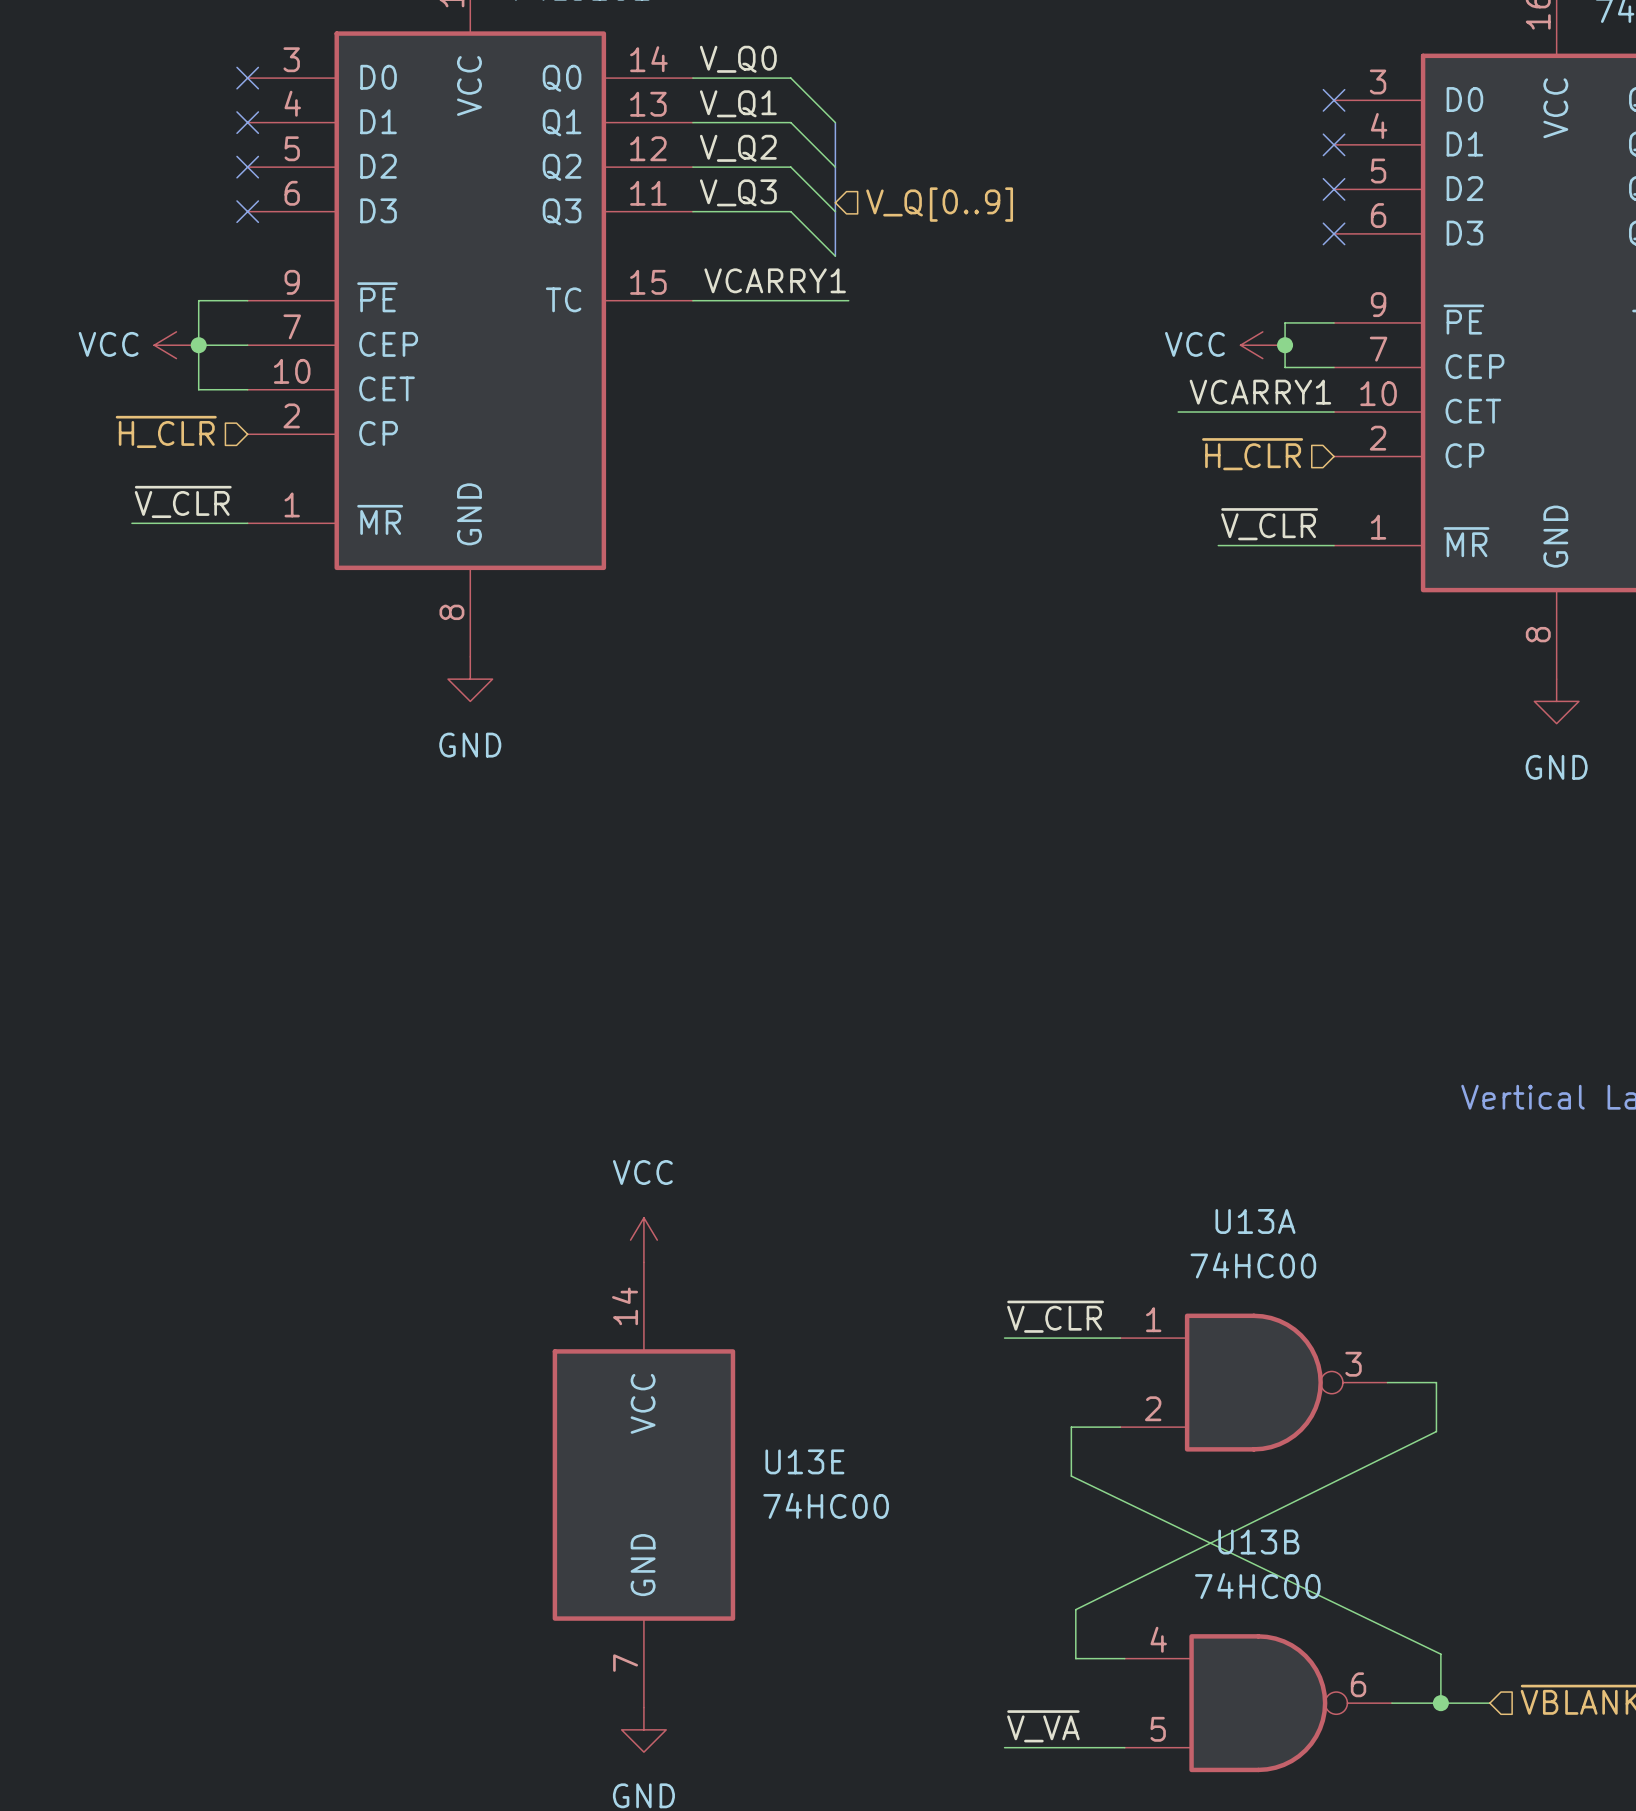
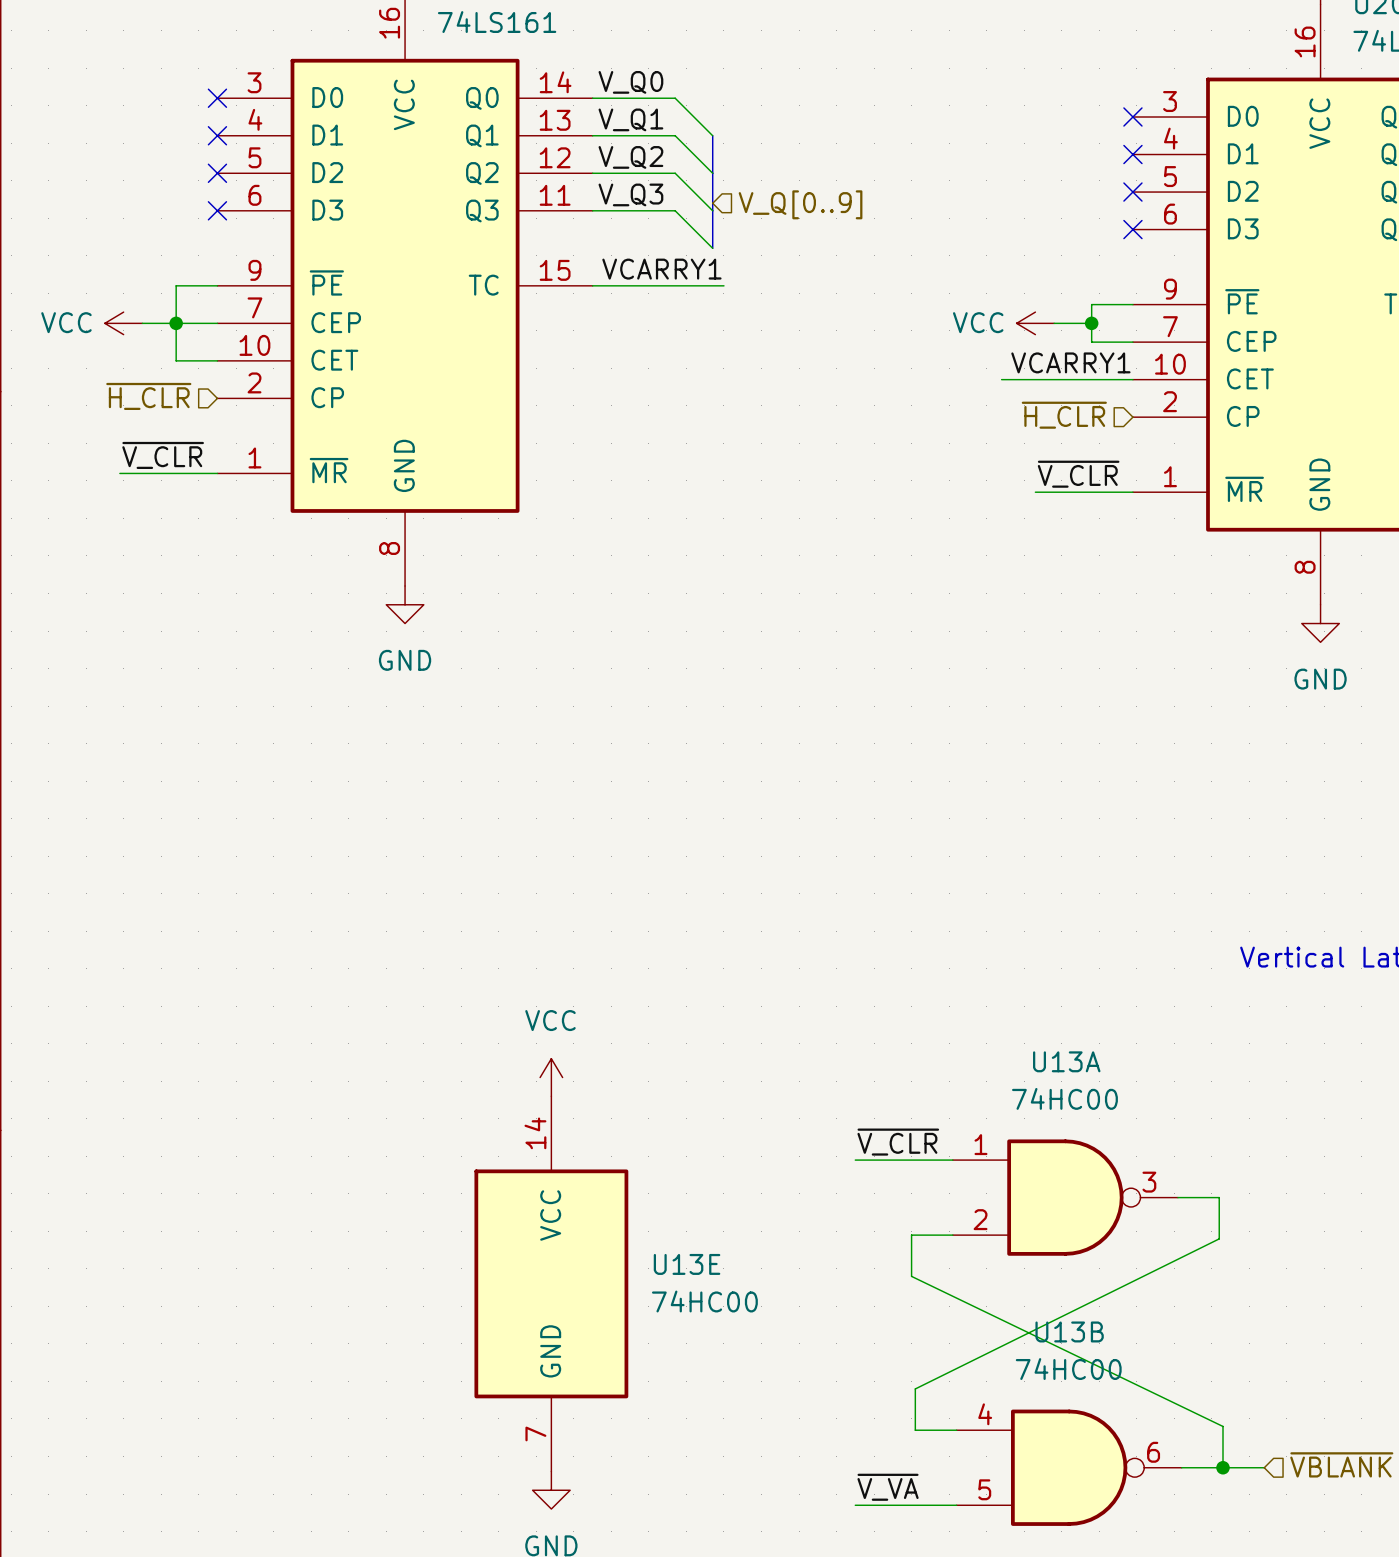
power symbol position: VCC (176, 345) -> VCC (123, 323)
power symbol position: VCC (1262, 345) -> VCC (1035, 323)

